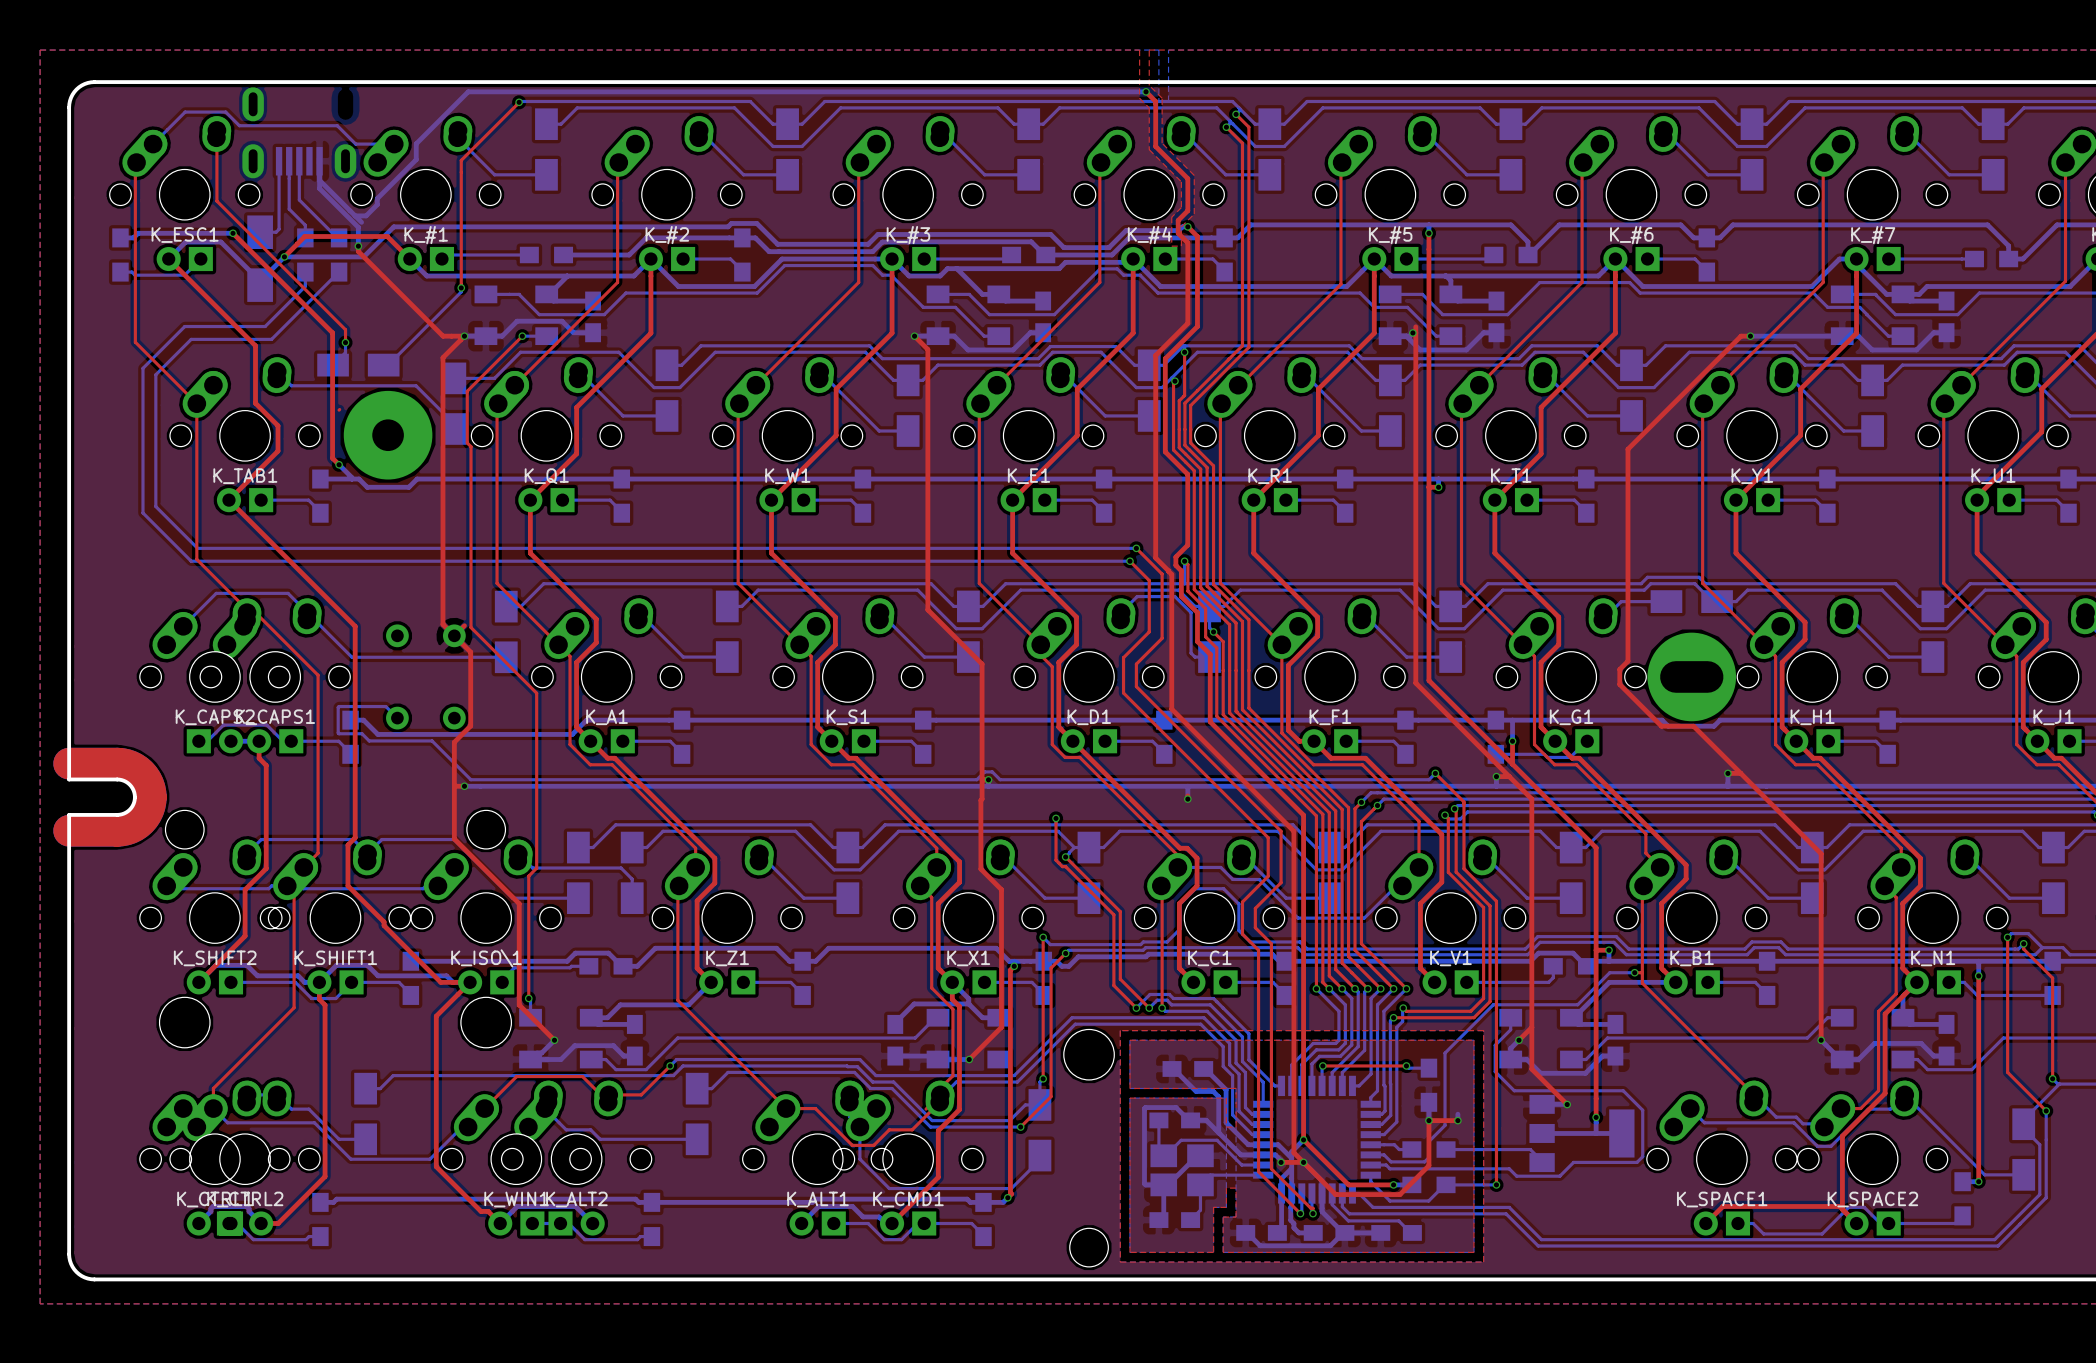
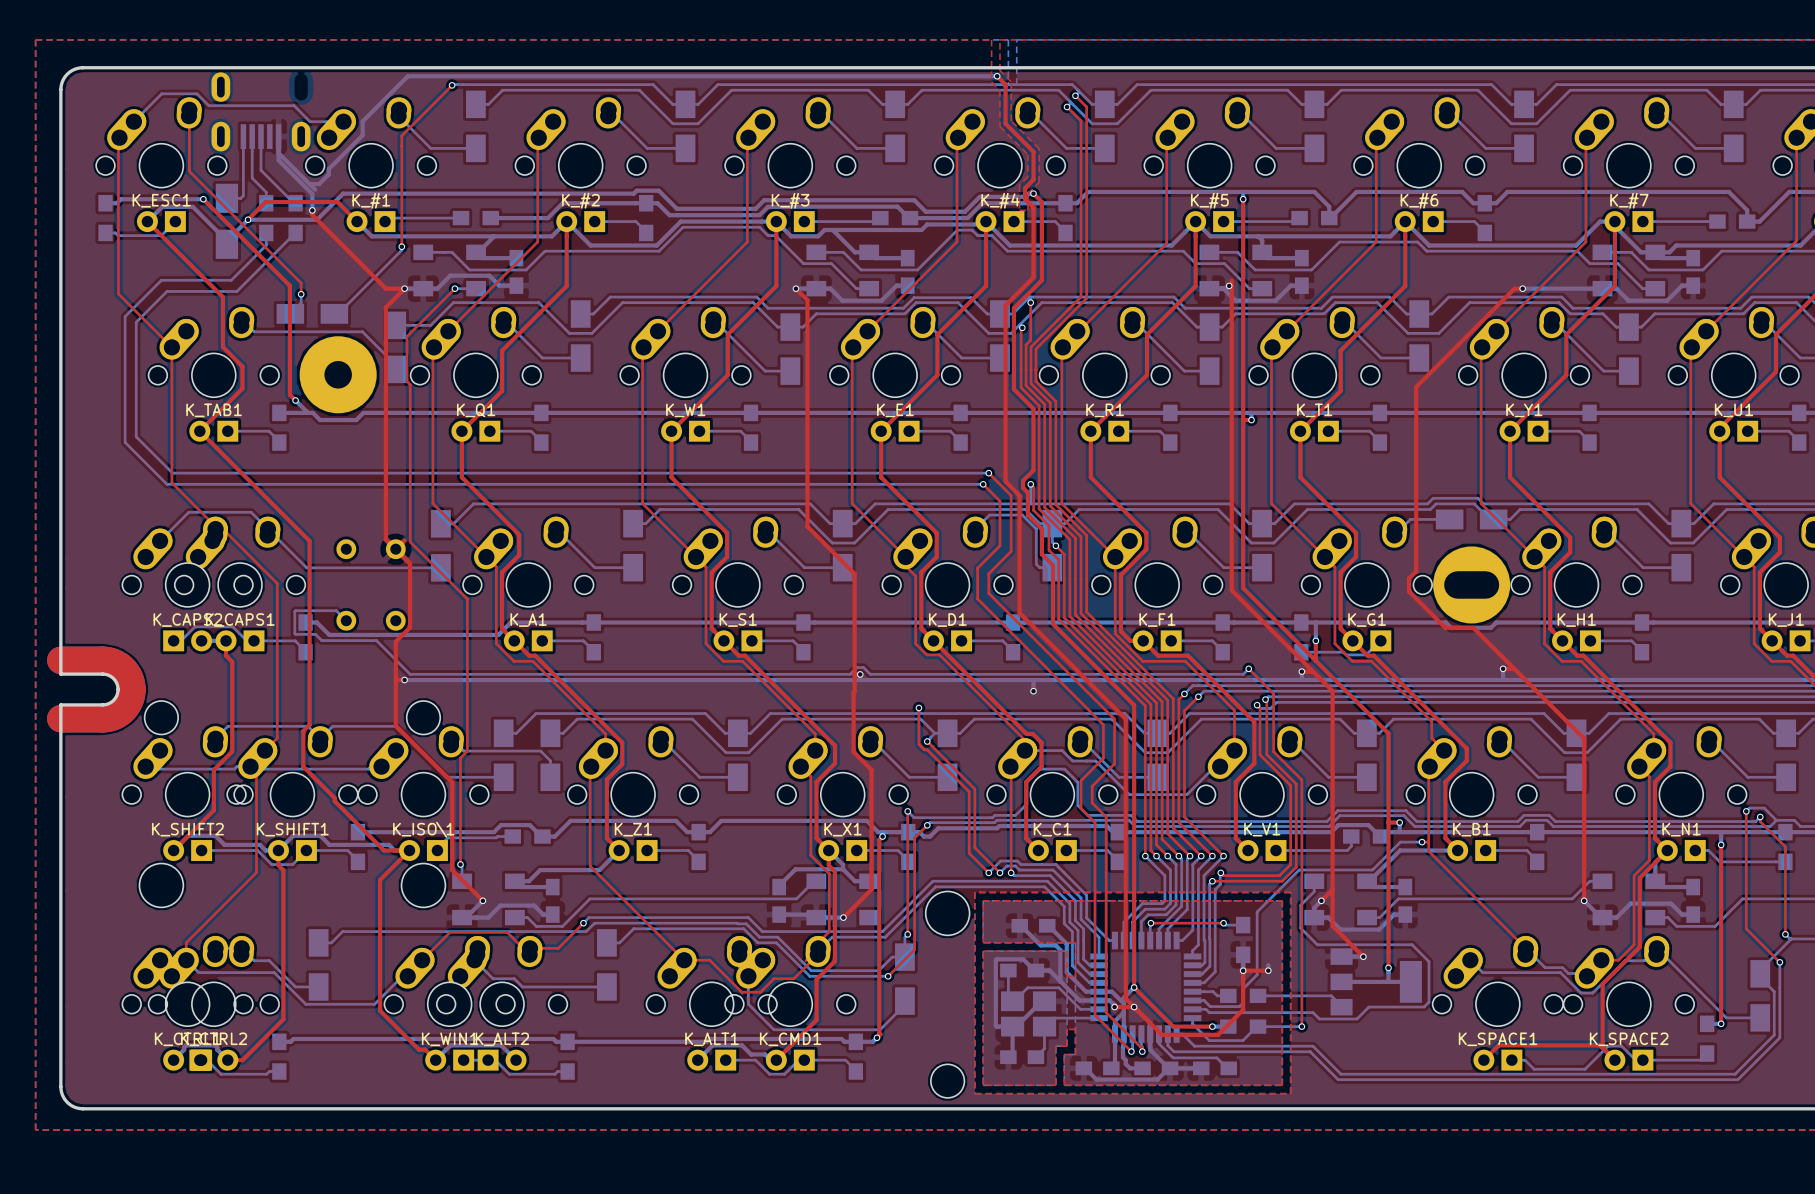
top track: (339, 409) (339, 410) -> none

